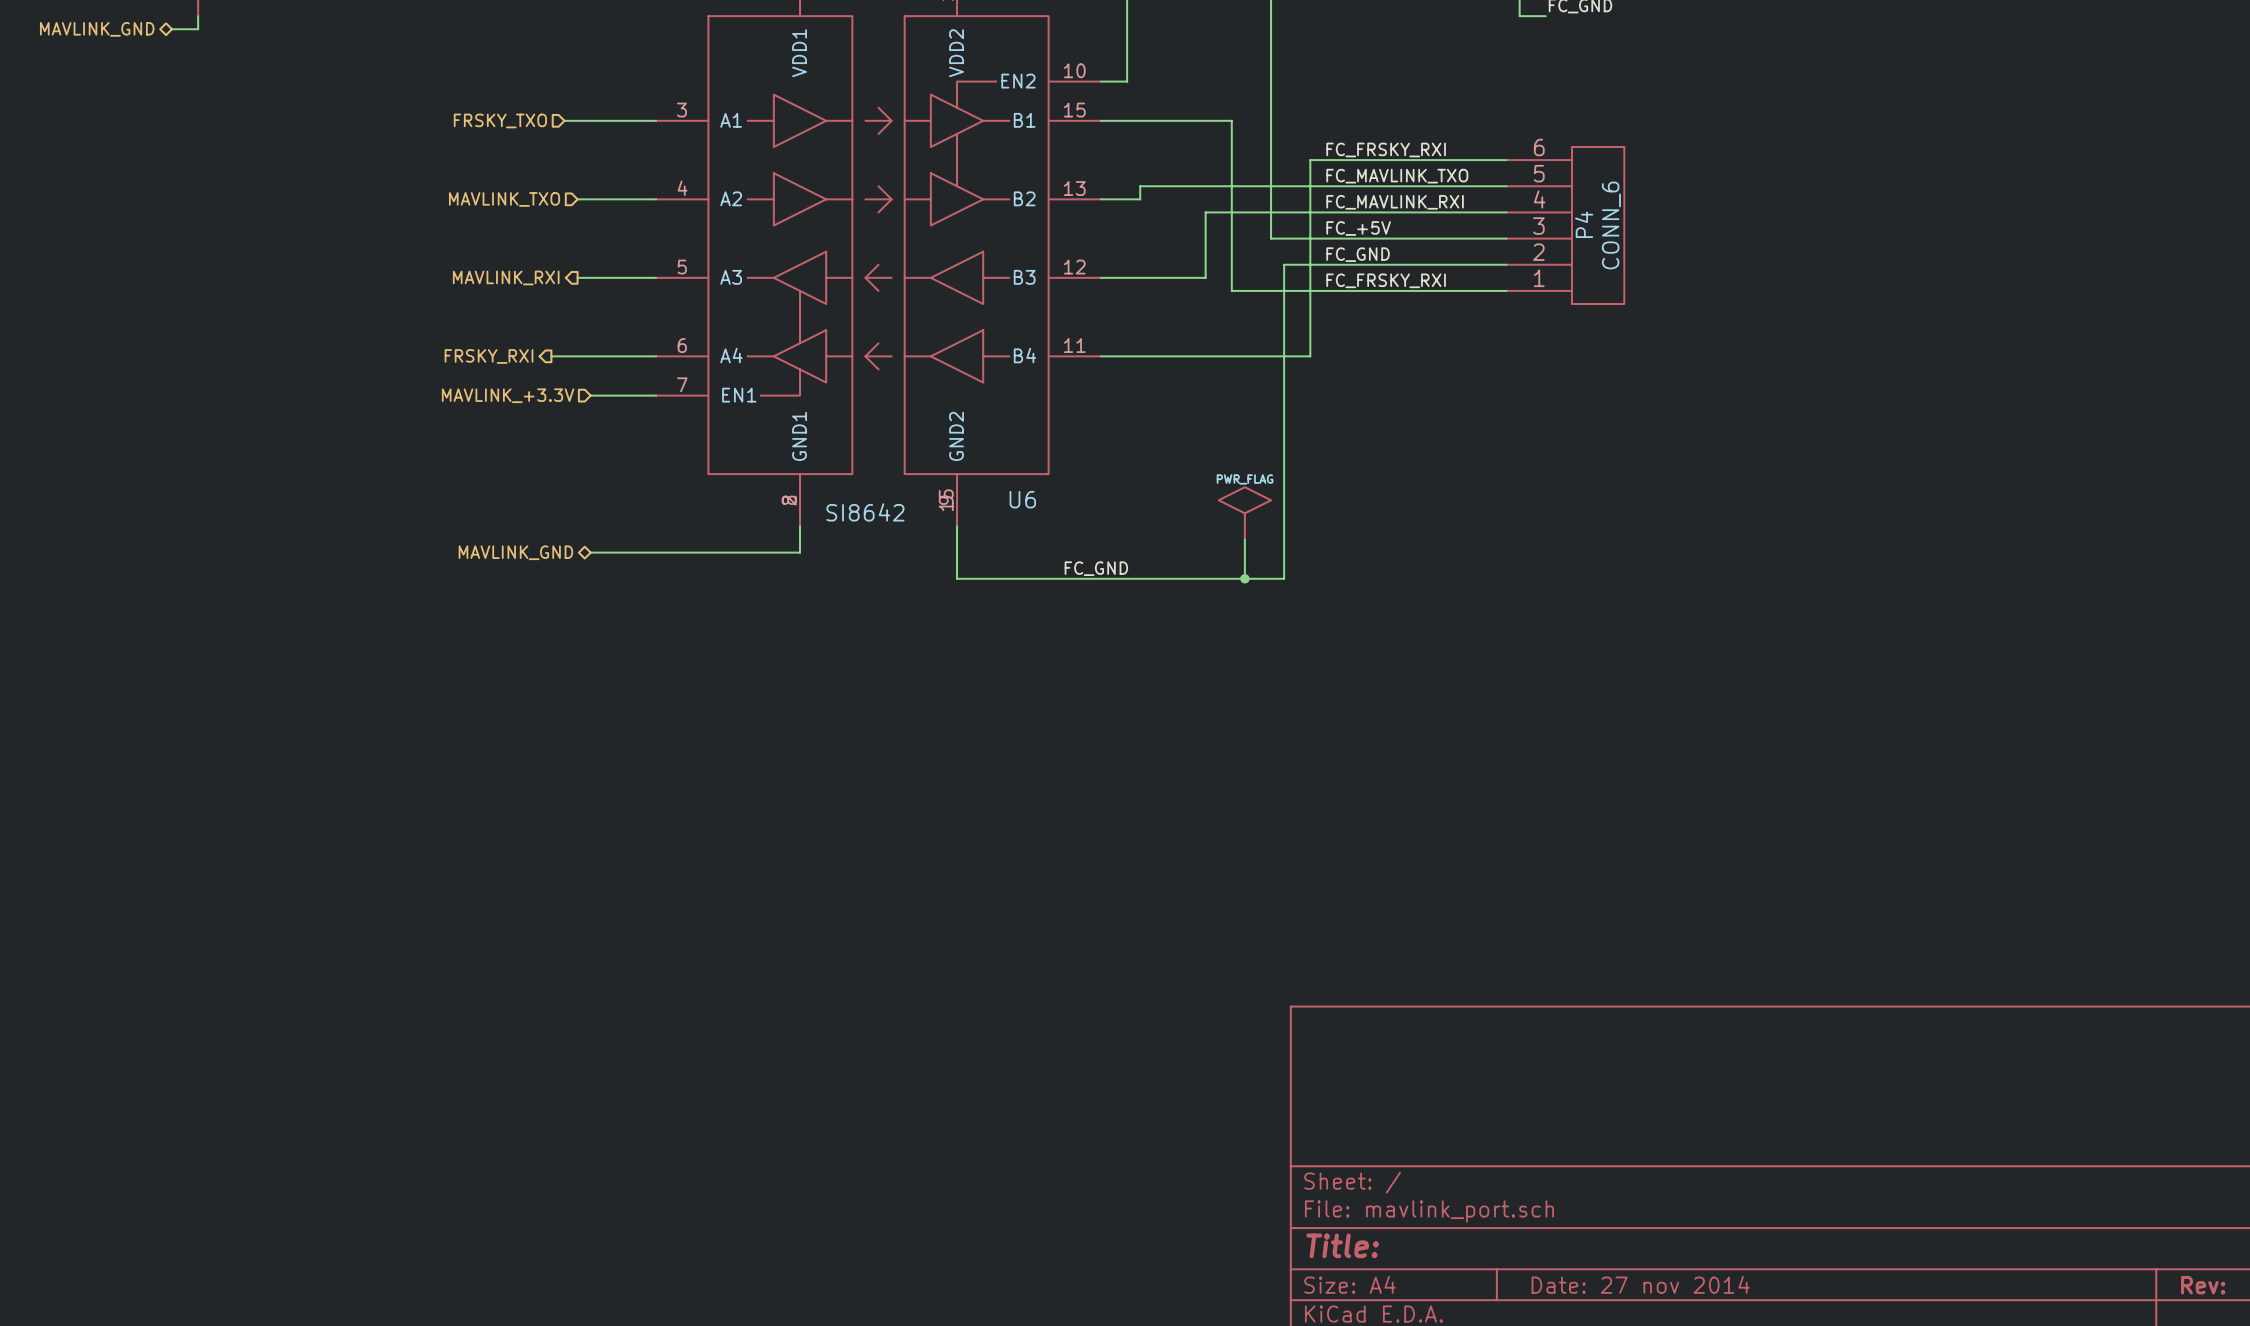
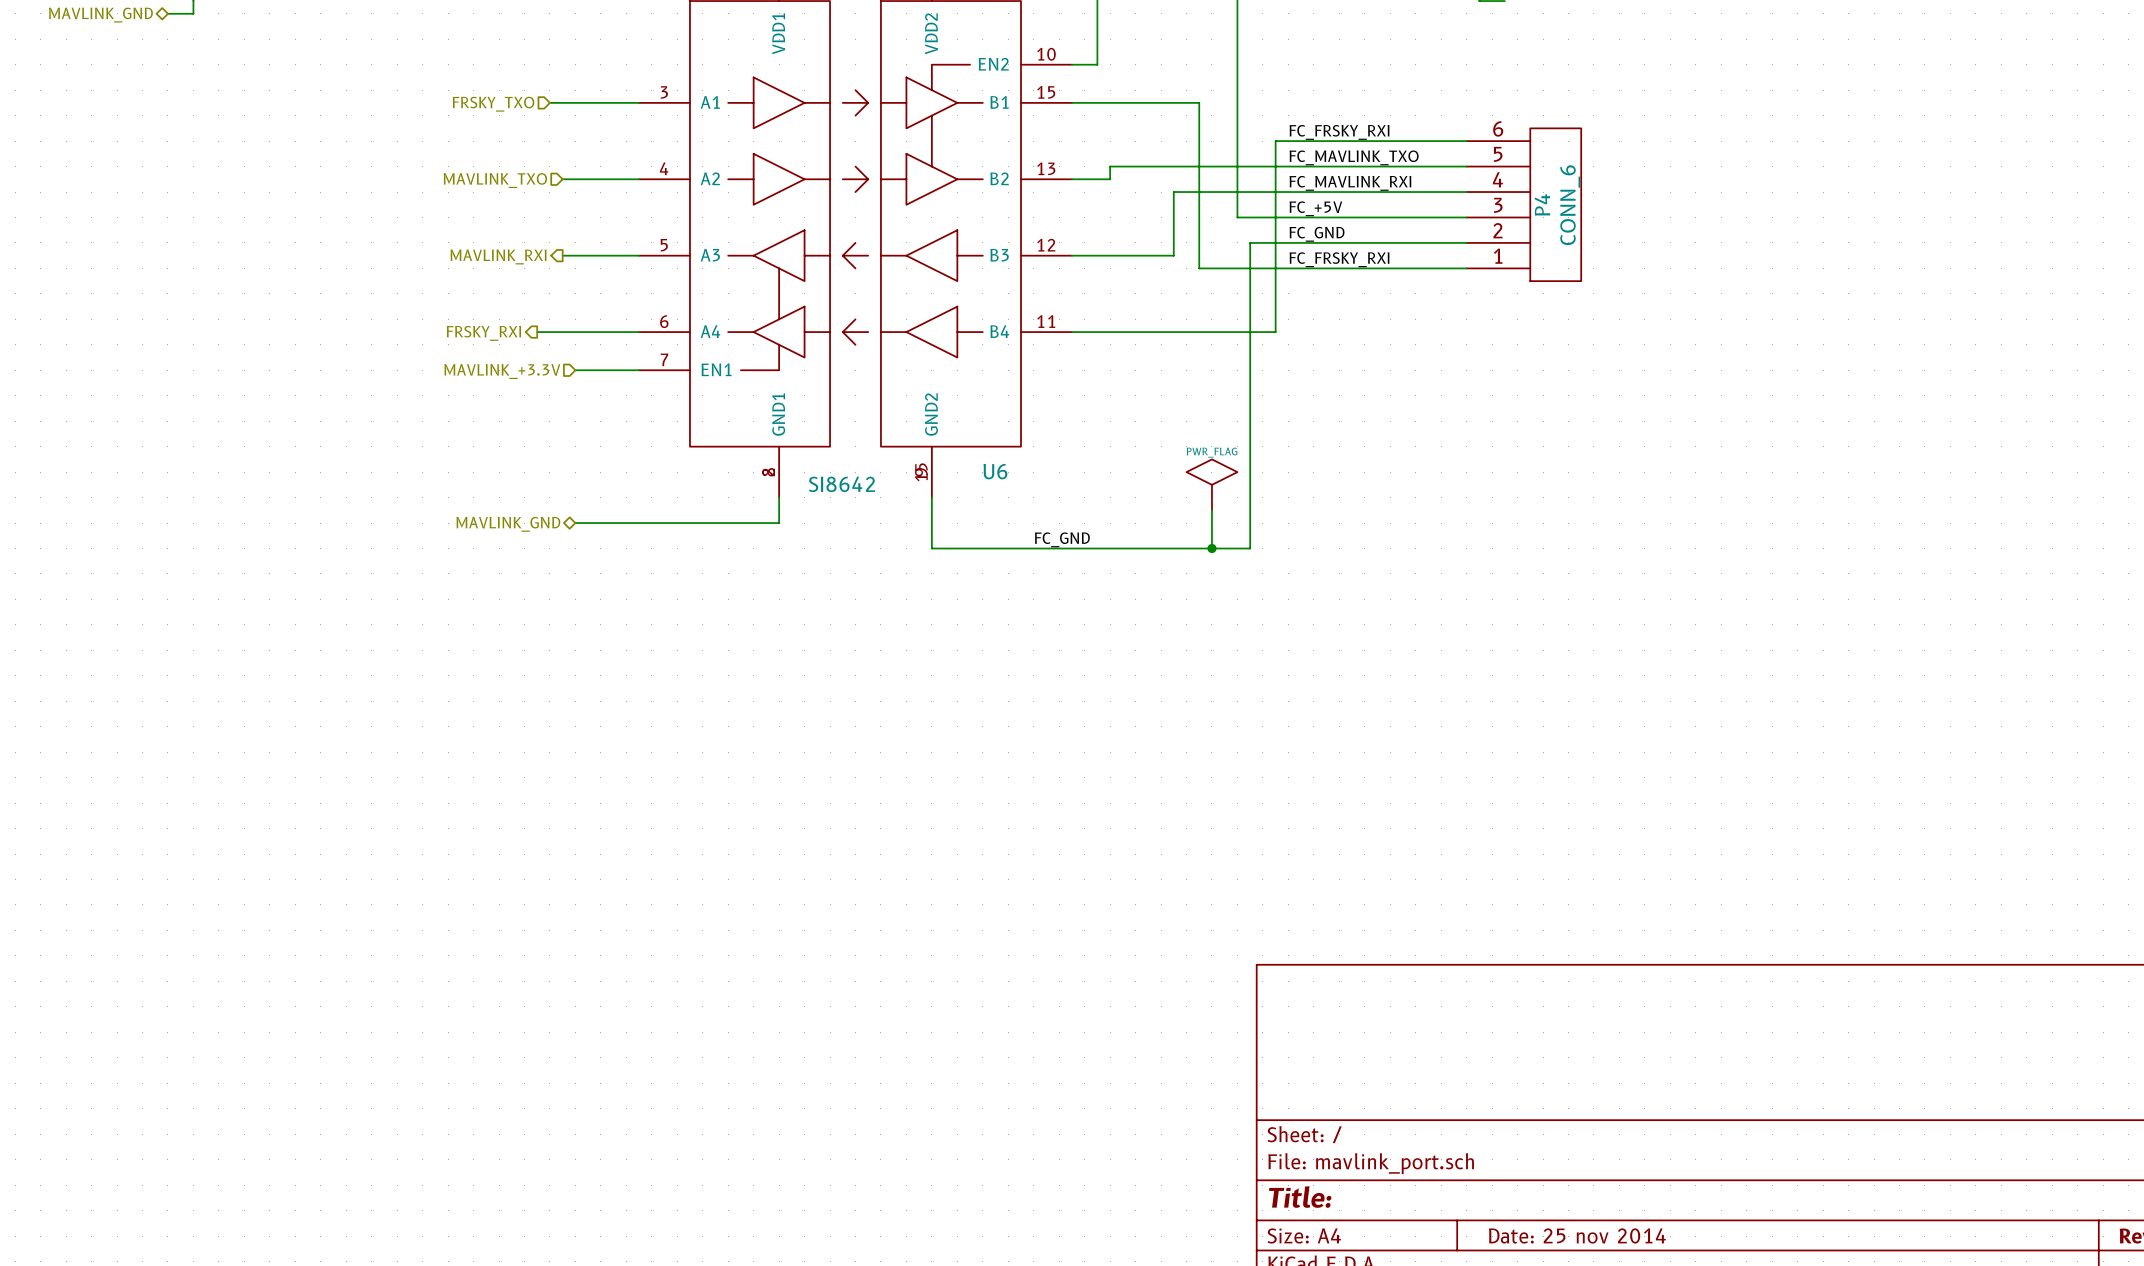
title block: Date: 27 nov 2014 (1640, 1284) -> Date: 25 nov 2014 (1577, 1235)

